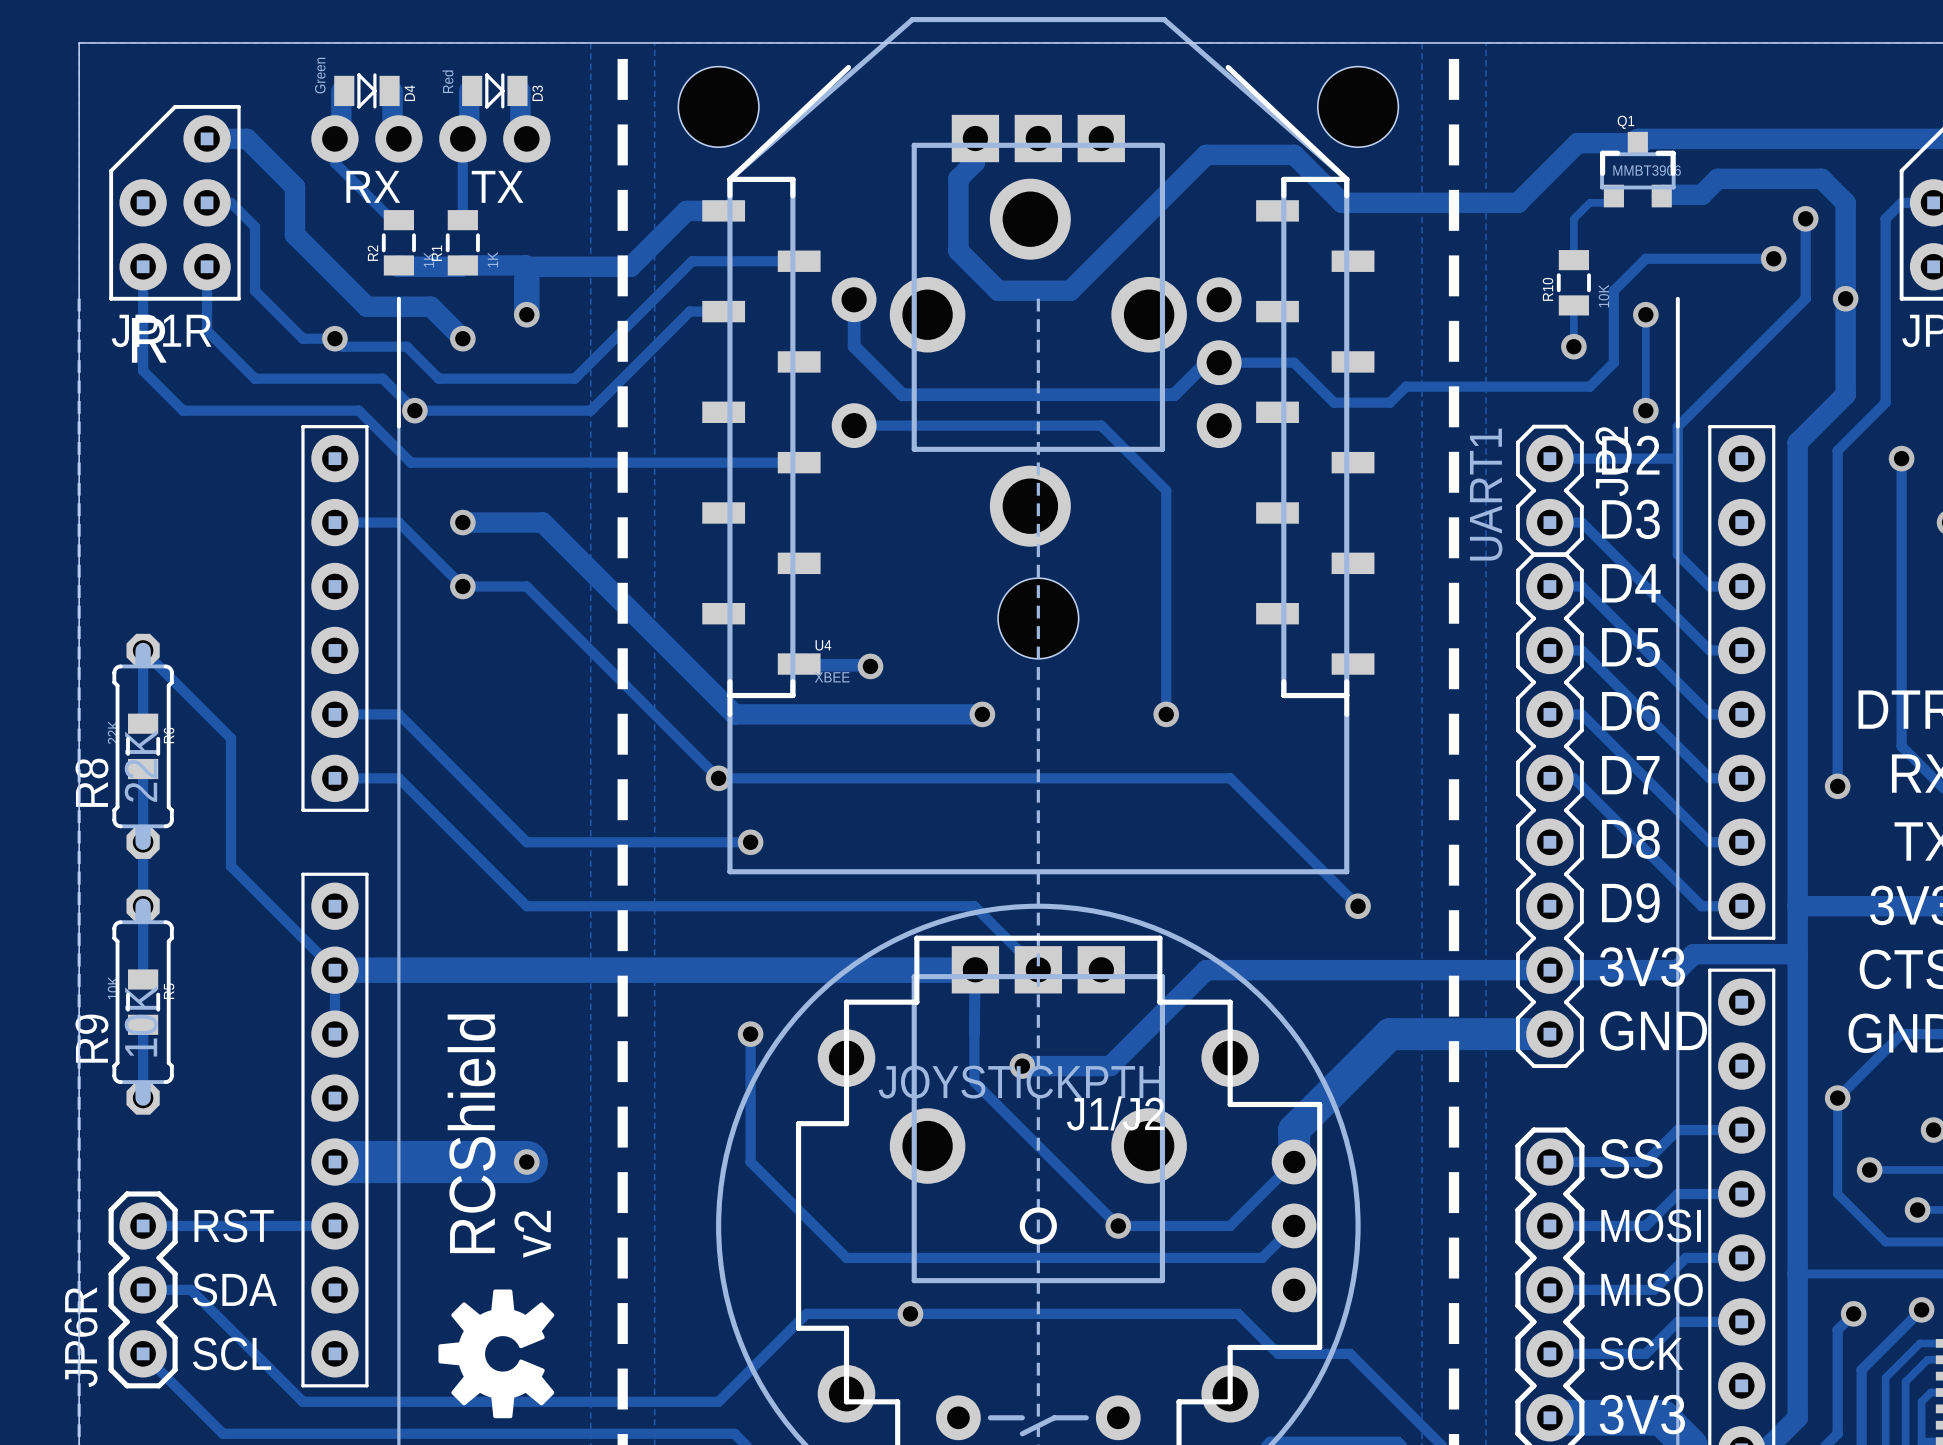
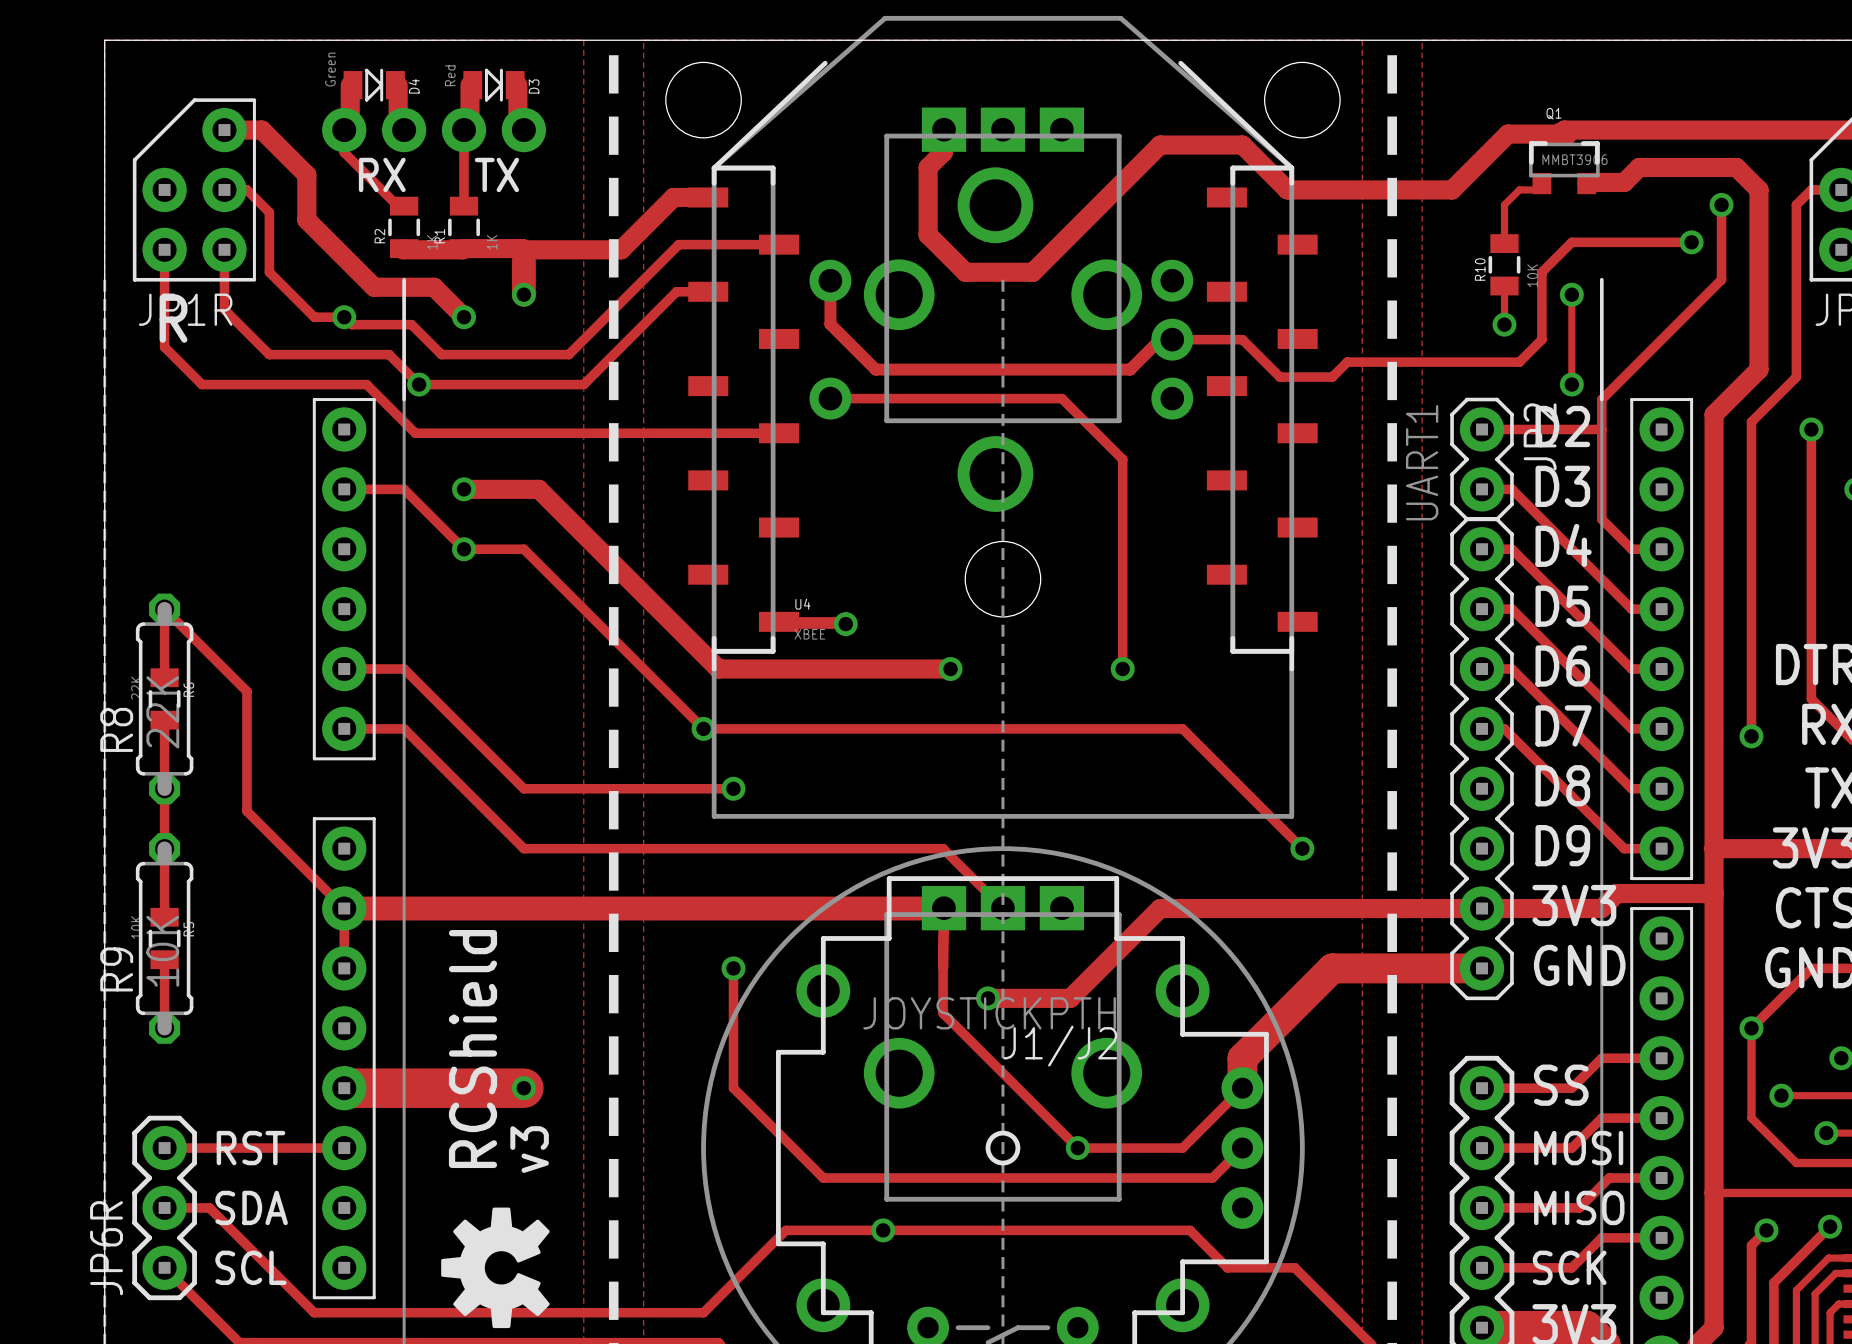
via: (1845, 298) -> none
text: v2 (532, 1234) -> v3 (529, 1149)

